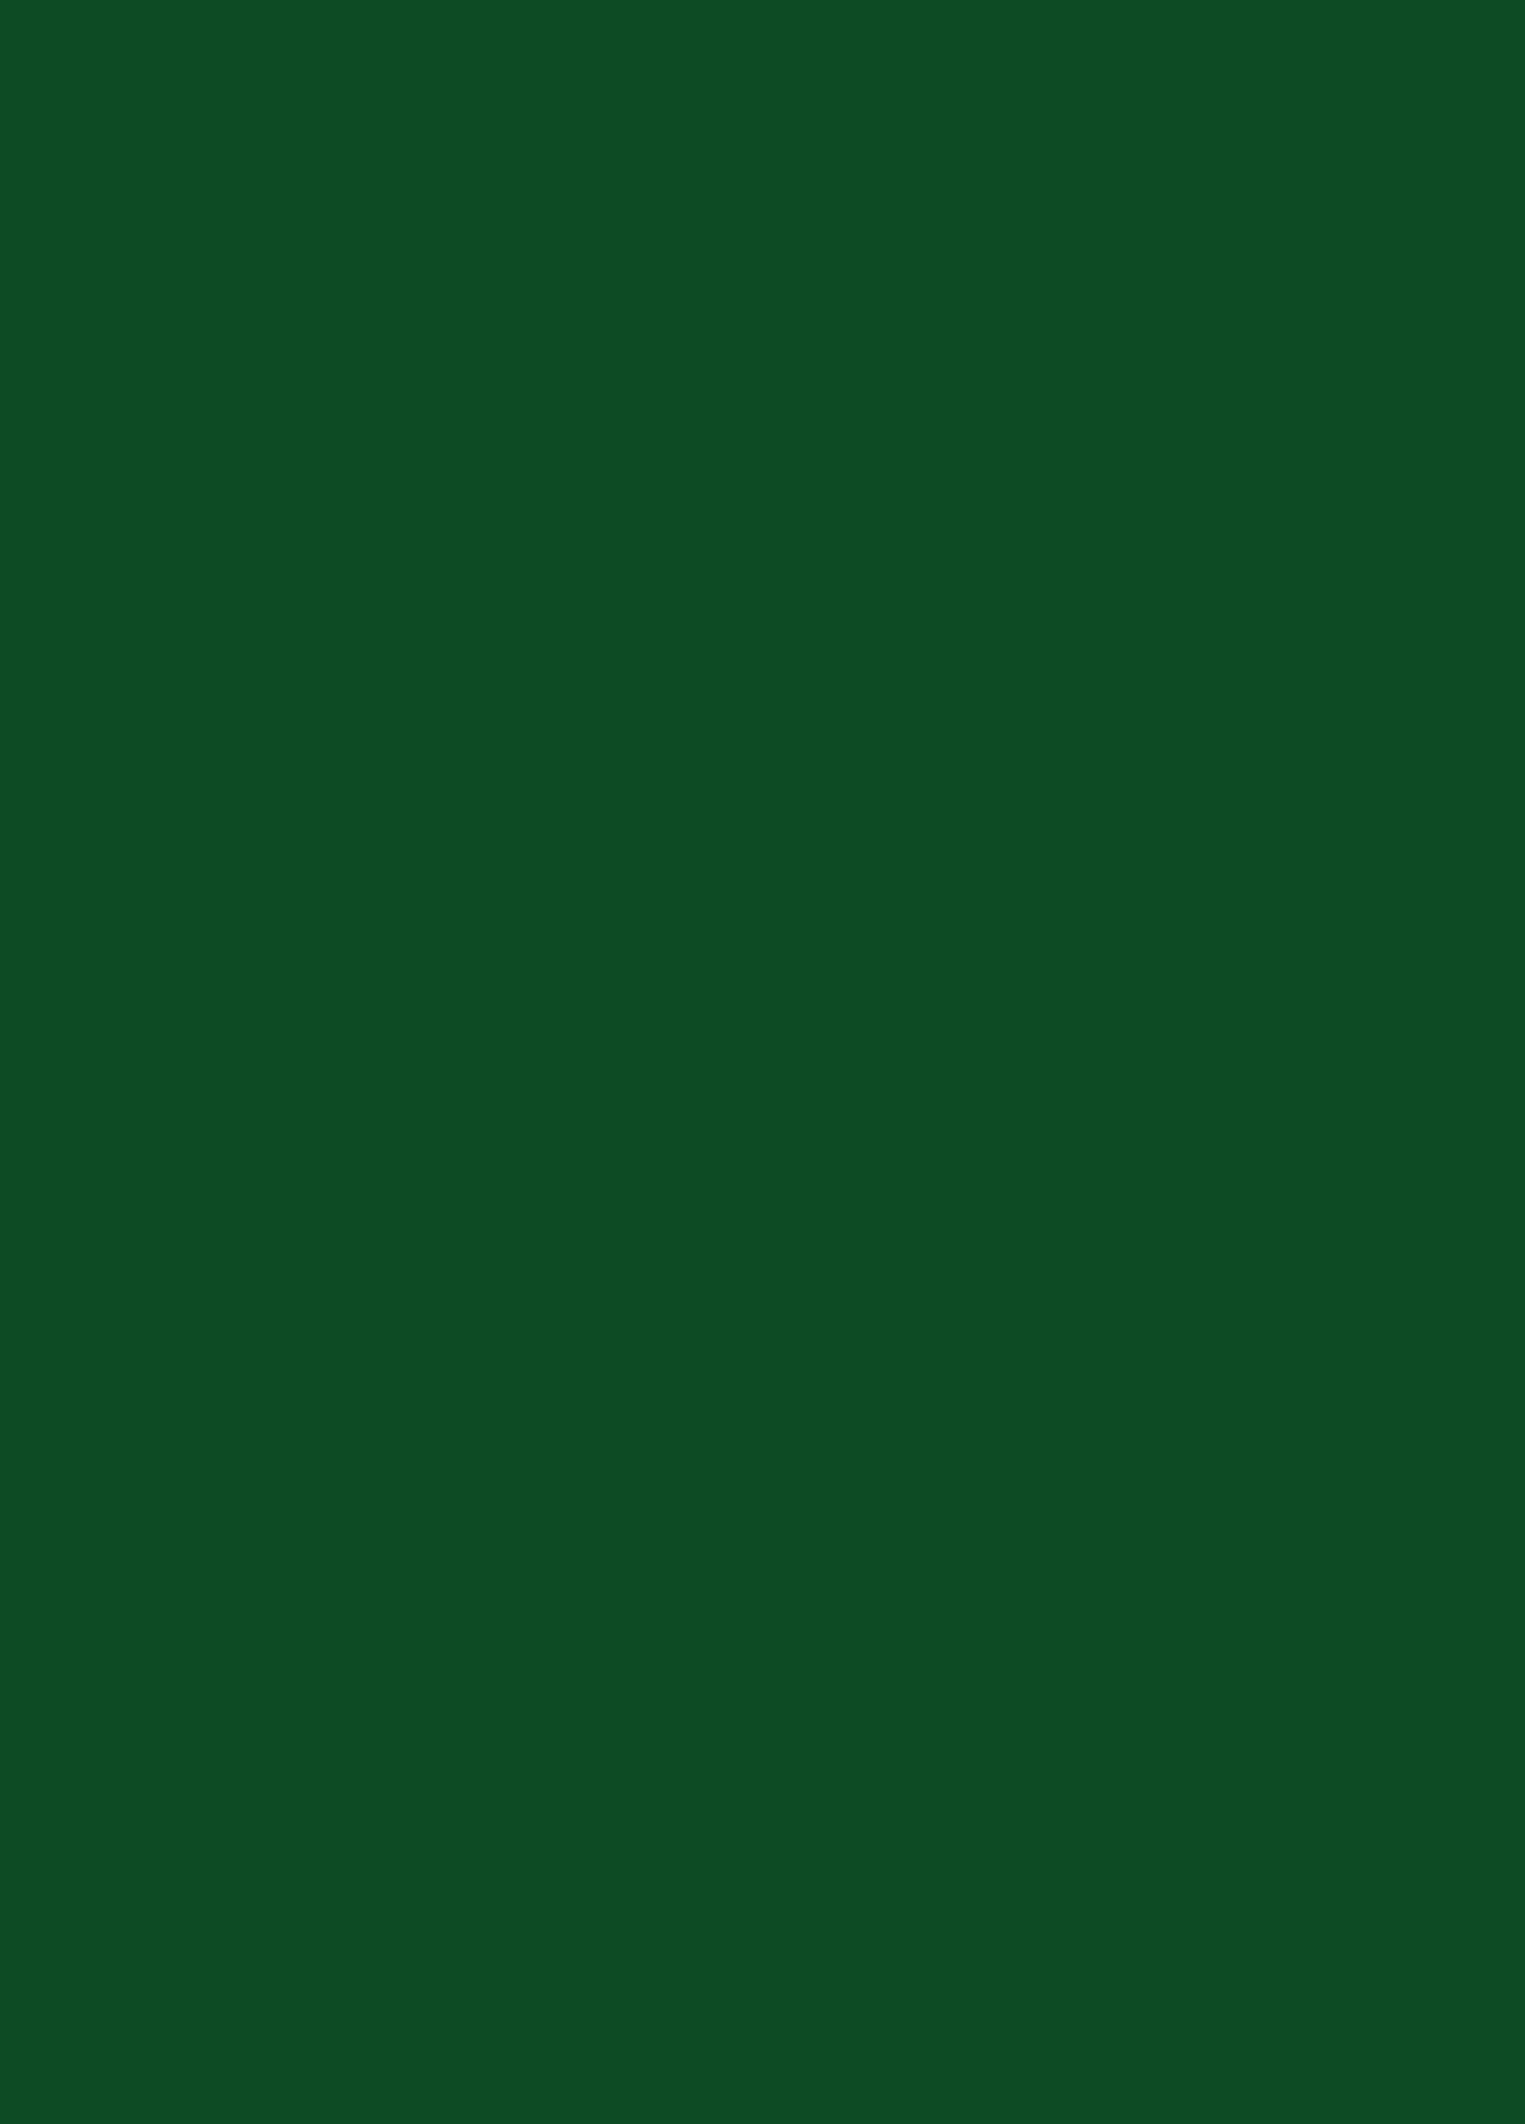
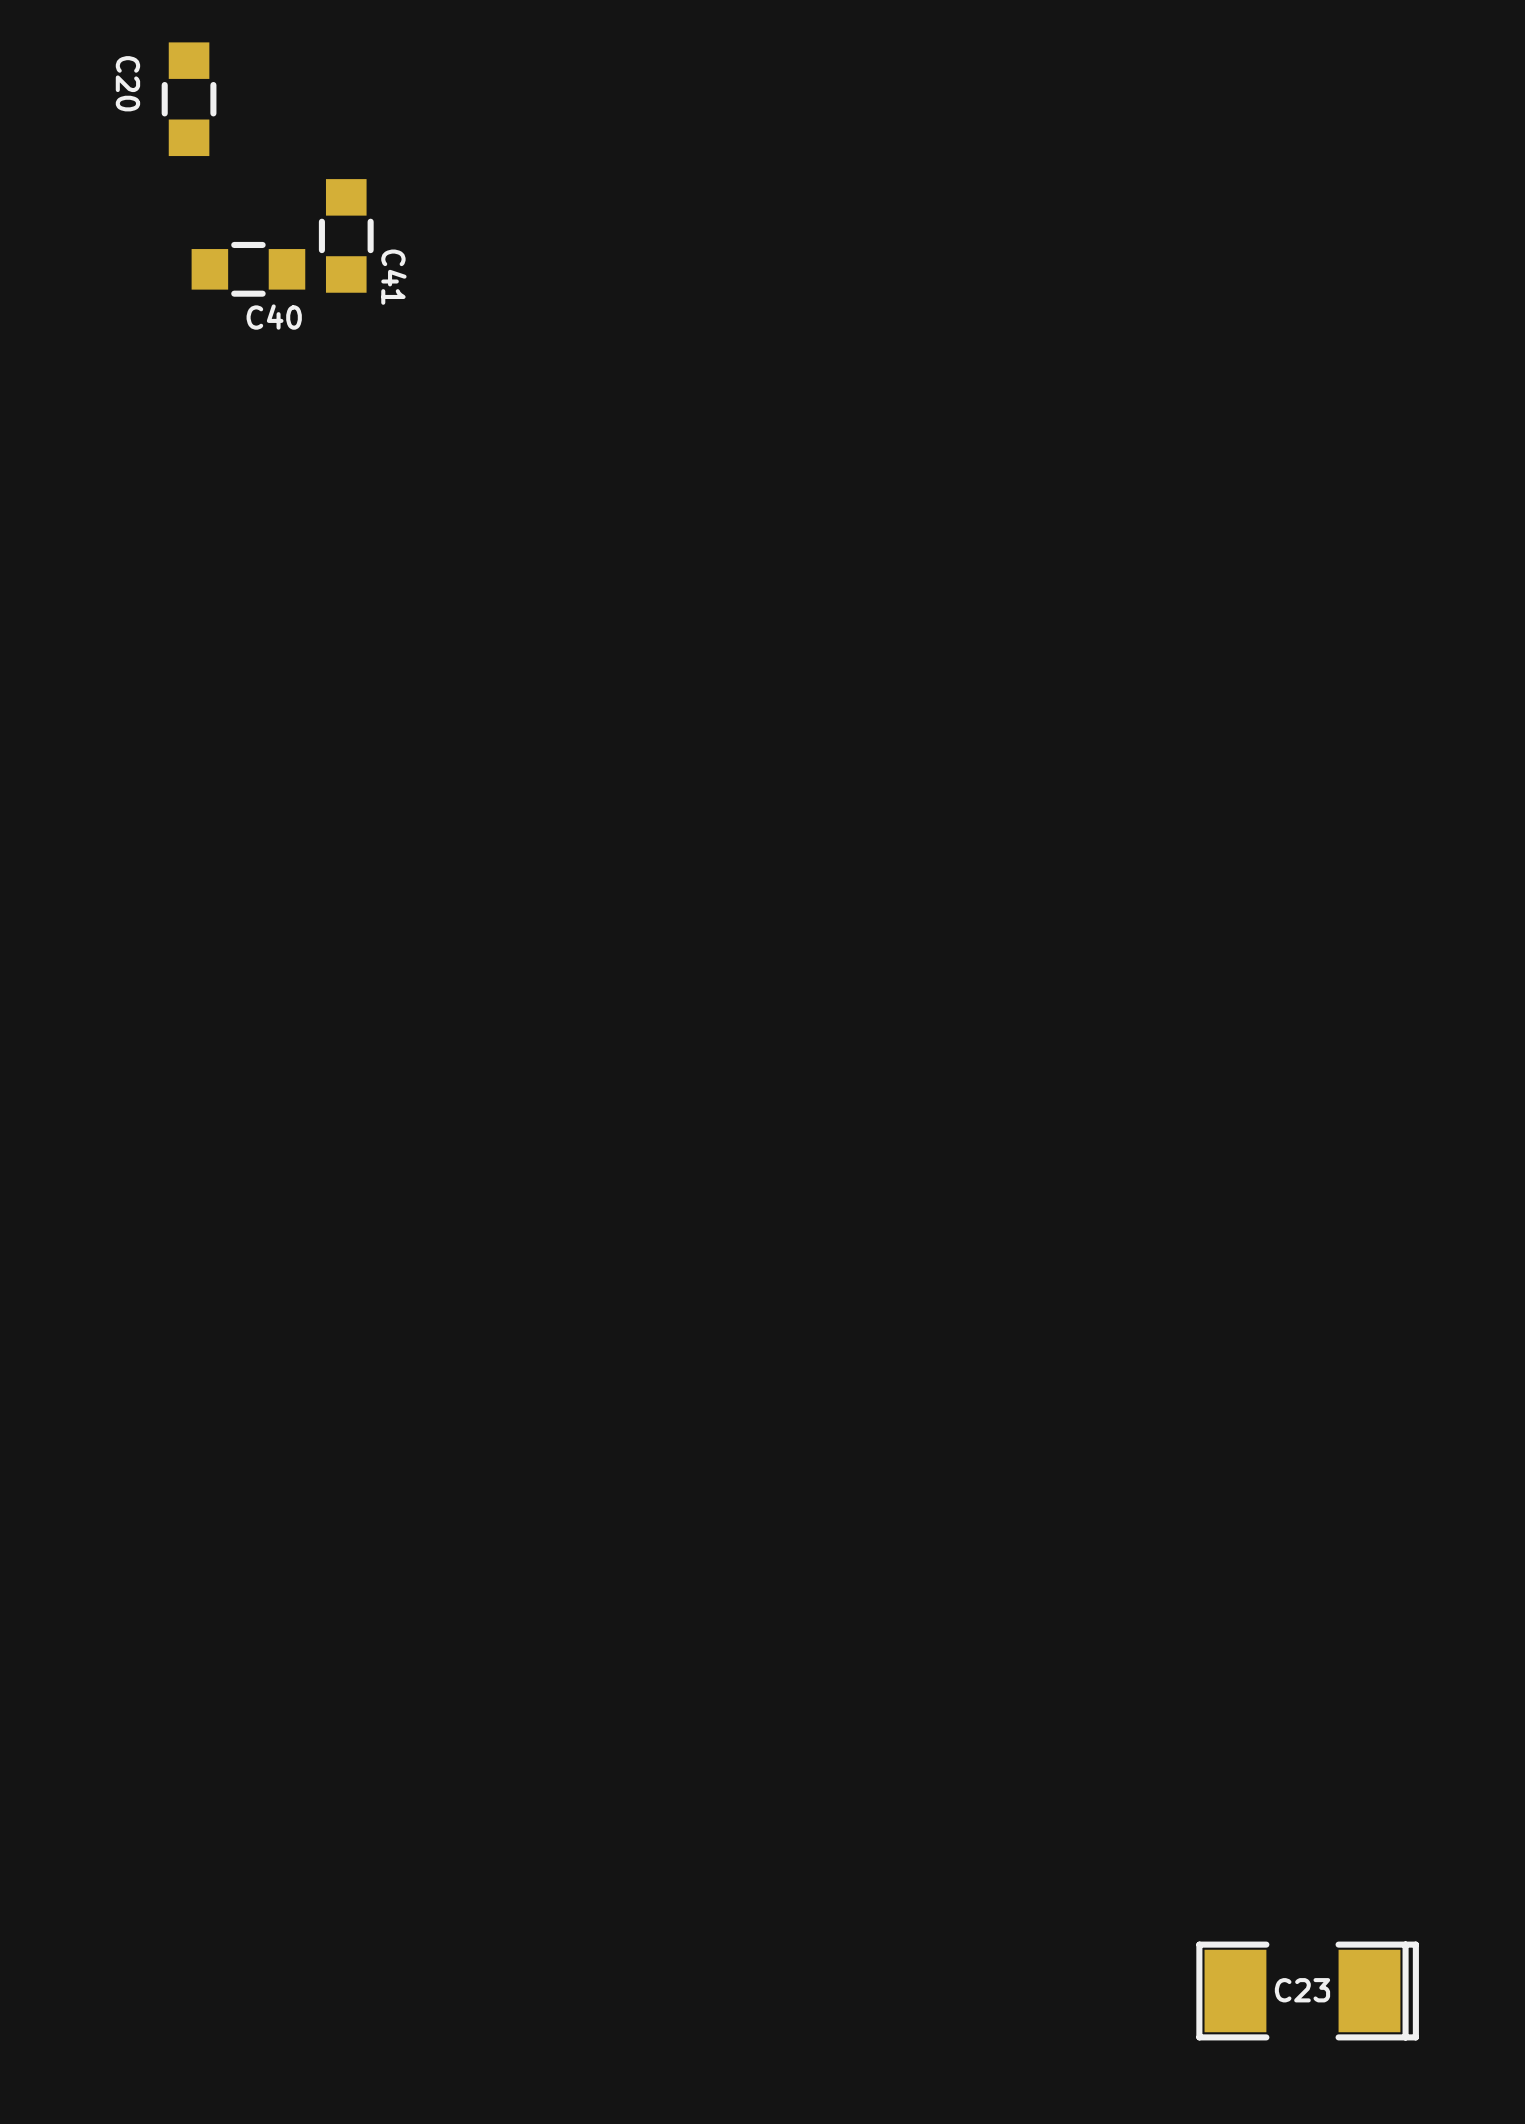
C20: none -> (189, 99)
C41: none -> (346, 235)
C40: none -> (248, 269)
C23: none -> (1307, 1991)

